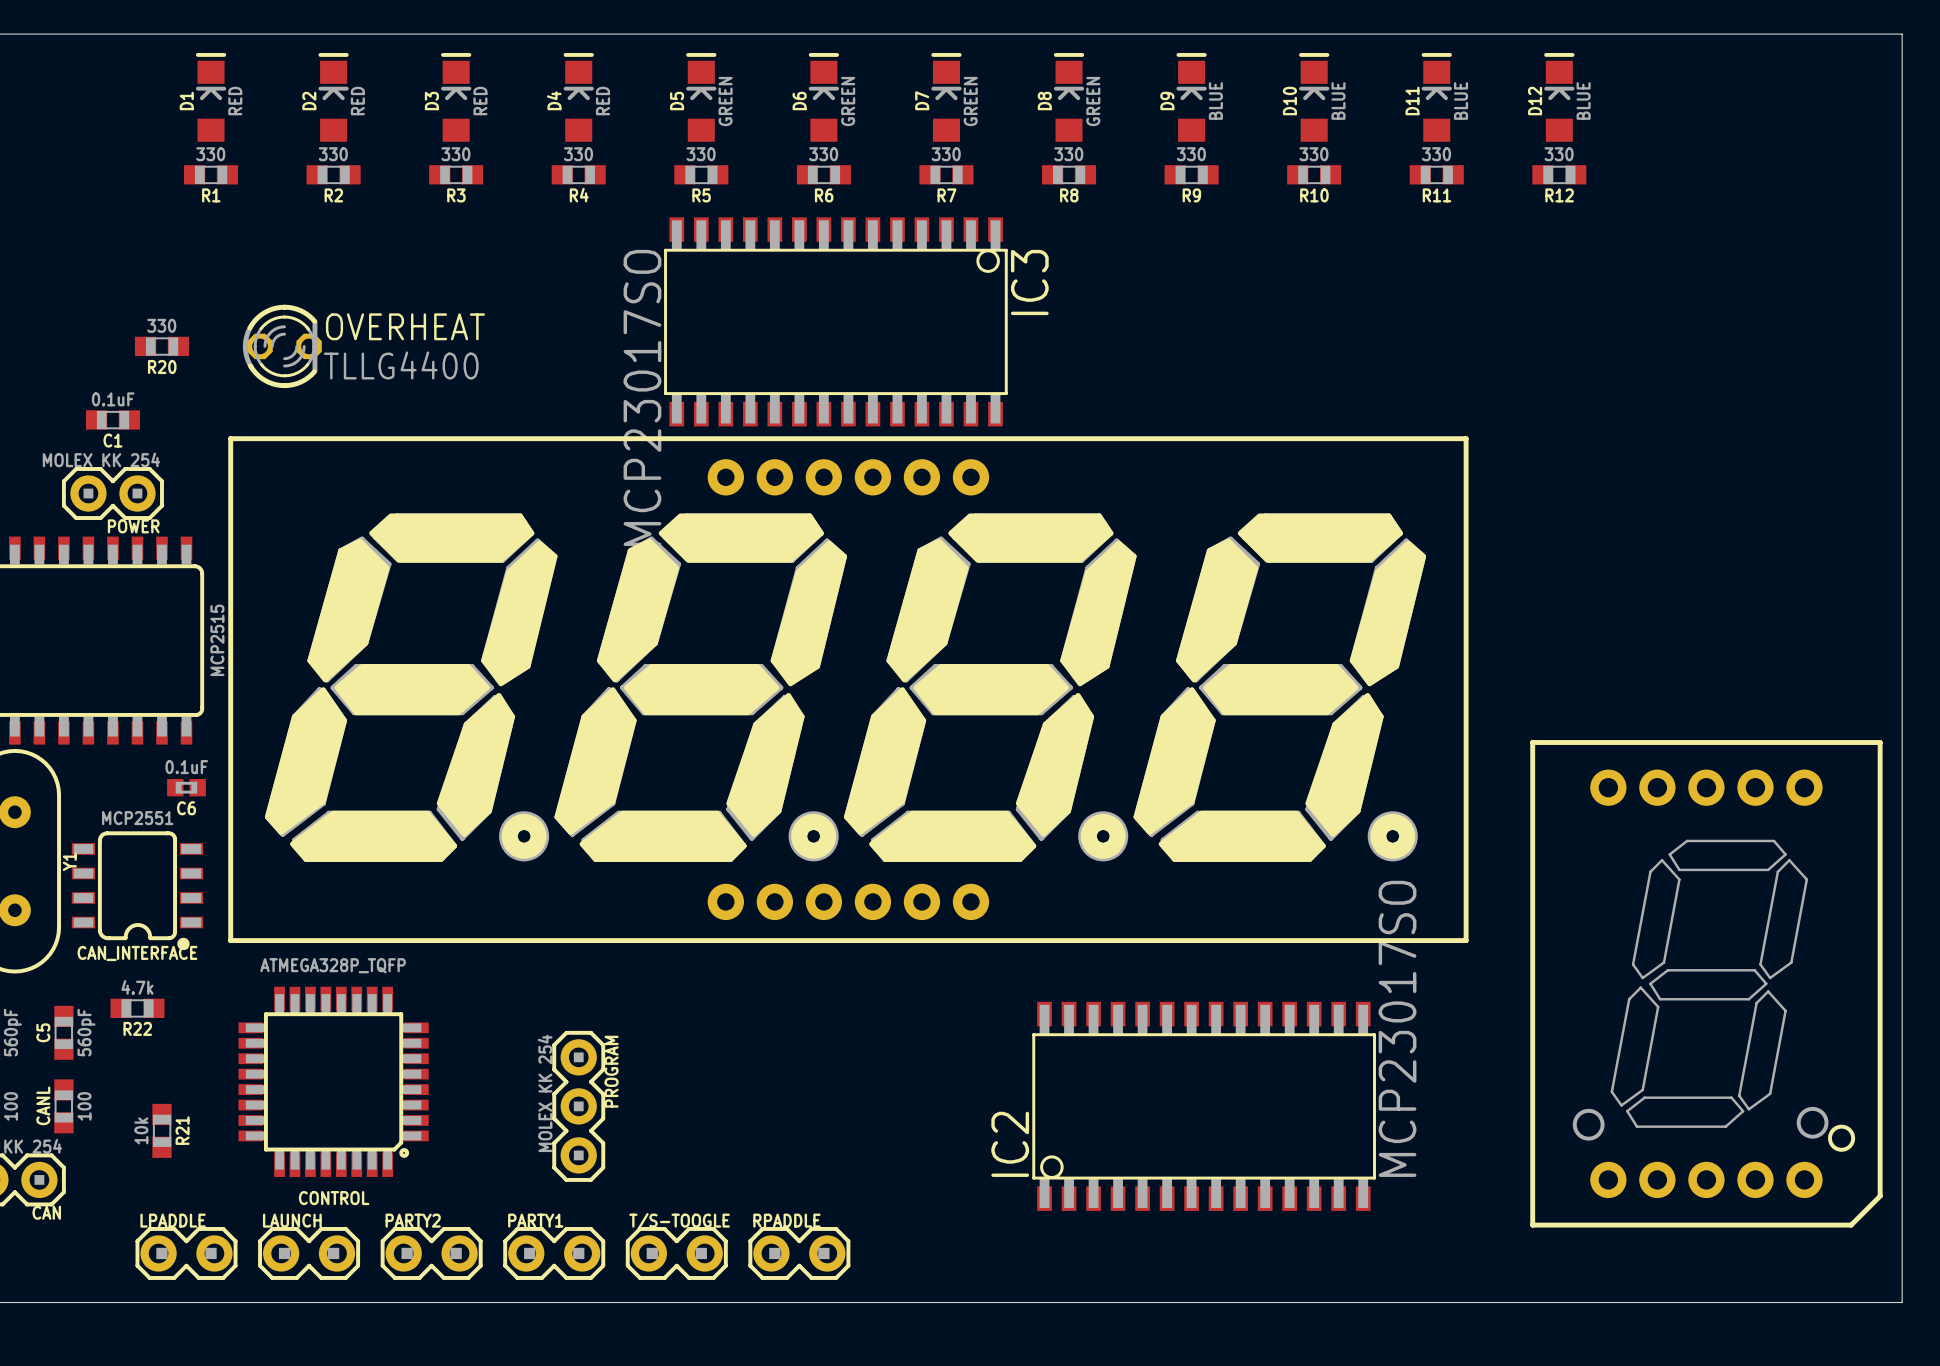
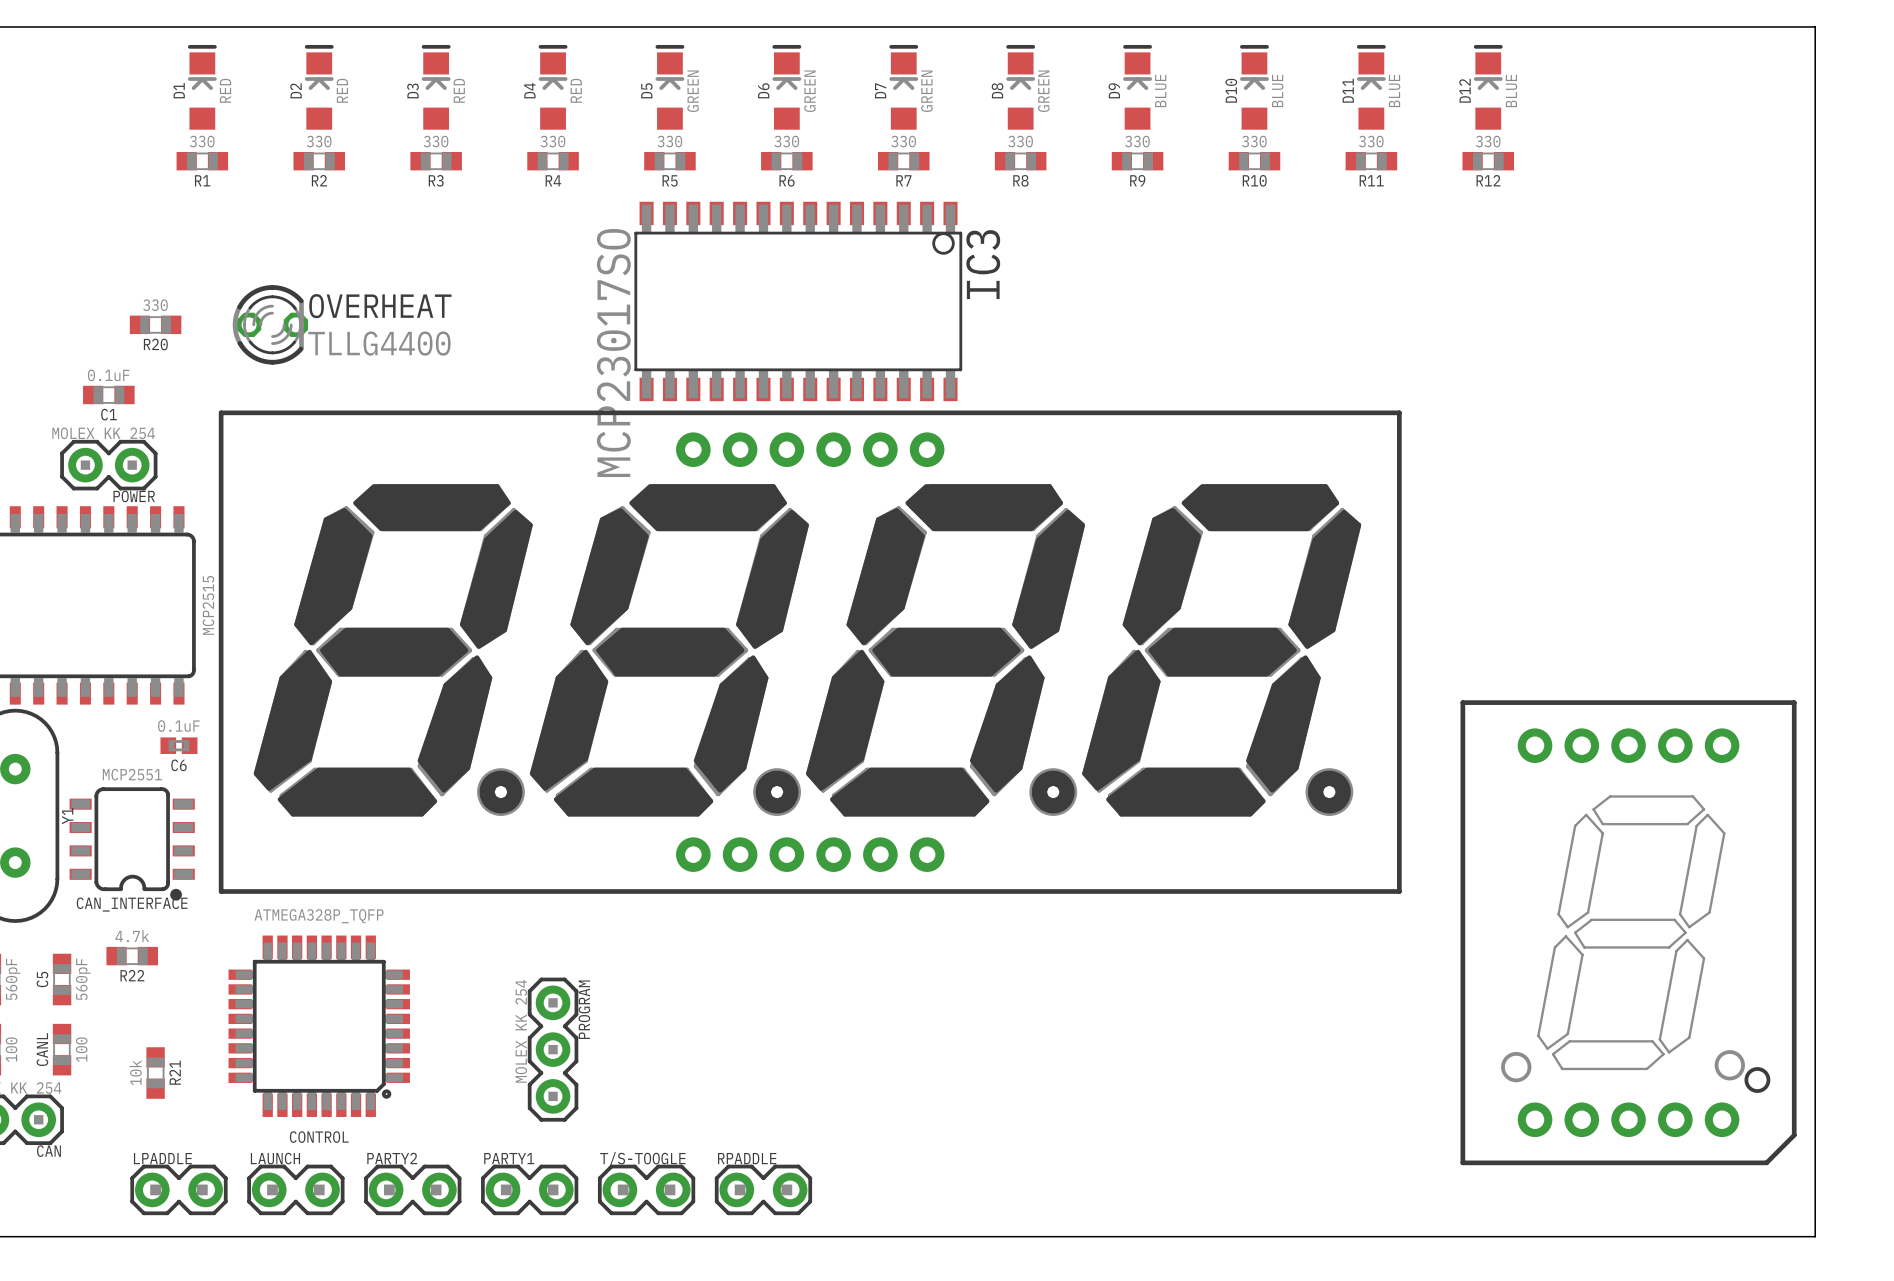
IC2: MCP23017SO (1204, 1106) -> none

